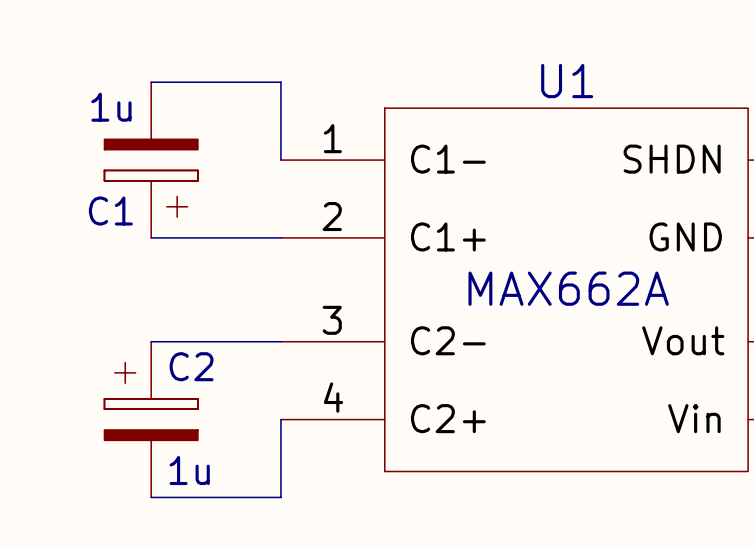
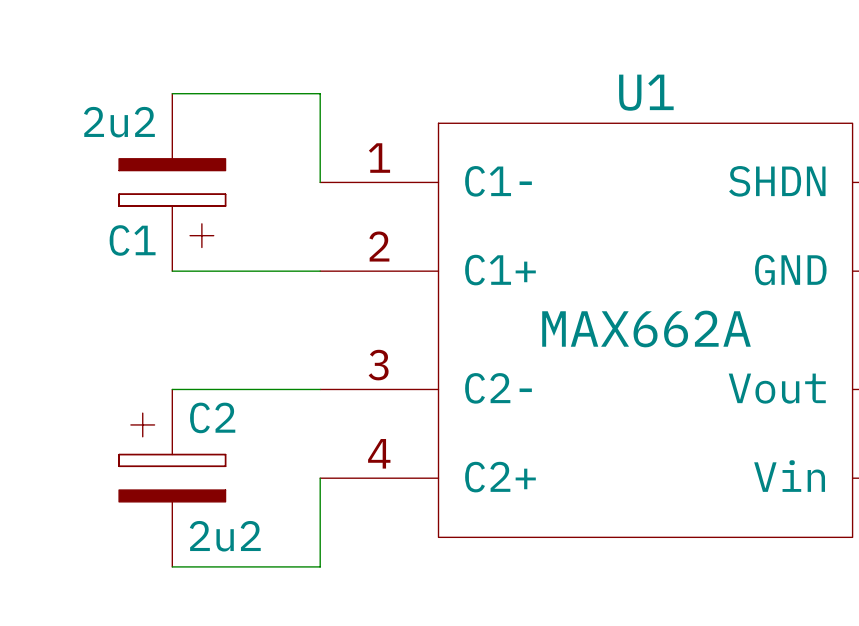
C1 value: 1u (111, 107) -> 2u2 (119, 122)
C2 value: 1u (189, 470) -> 2u2 (225, 536)

